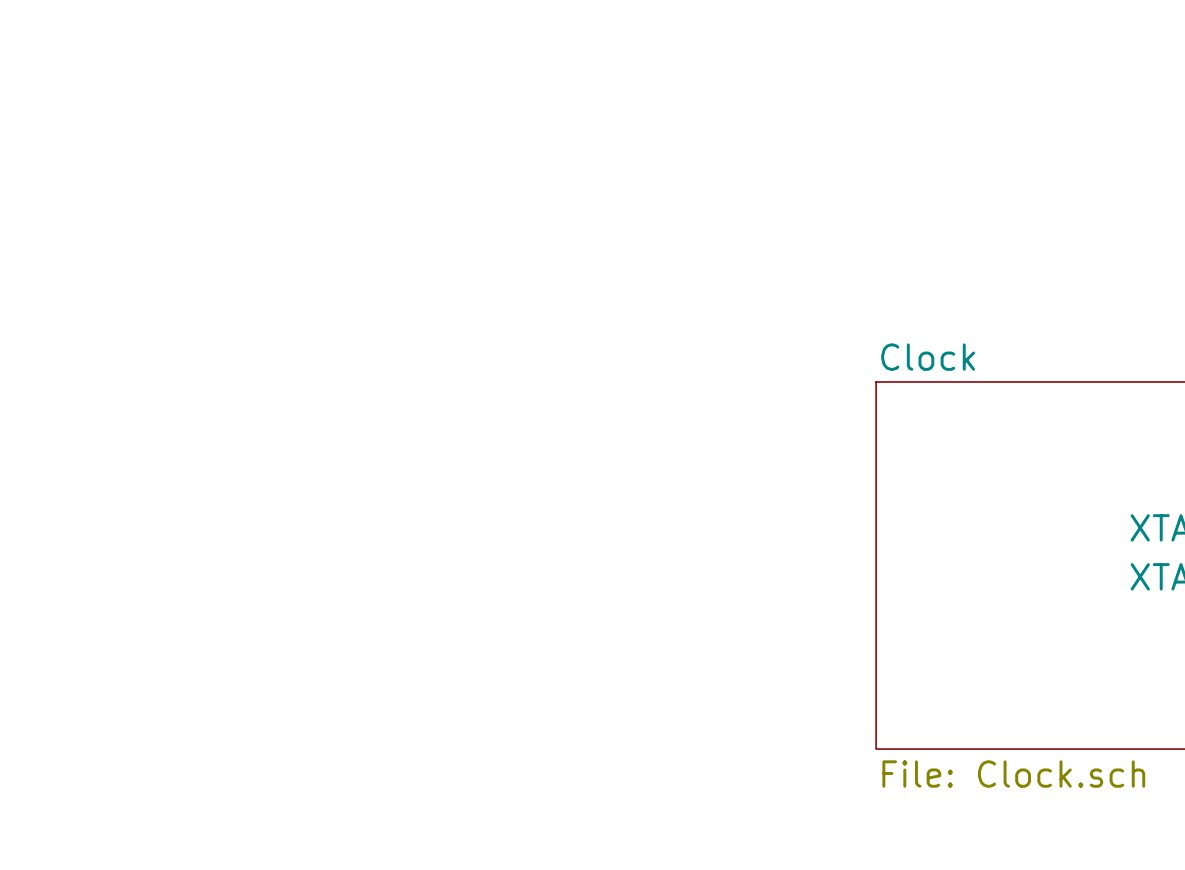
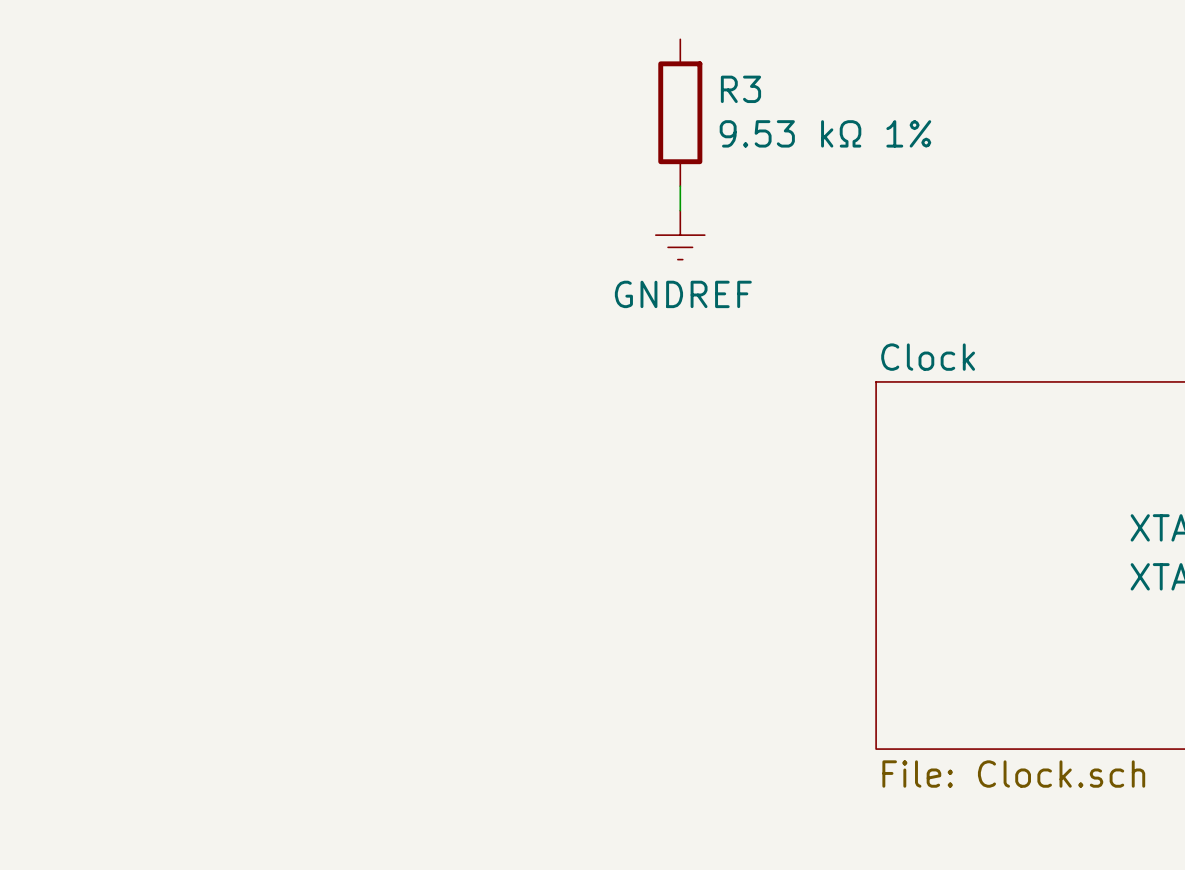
R3: none -> 9.53 kΩ 1% (680, 112)
wire: none -> (680, 186) (680, 210)
power symbol: none -> GNDREF (680, 235)

